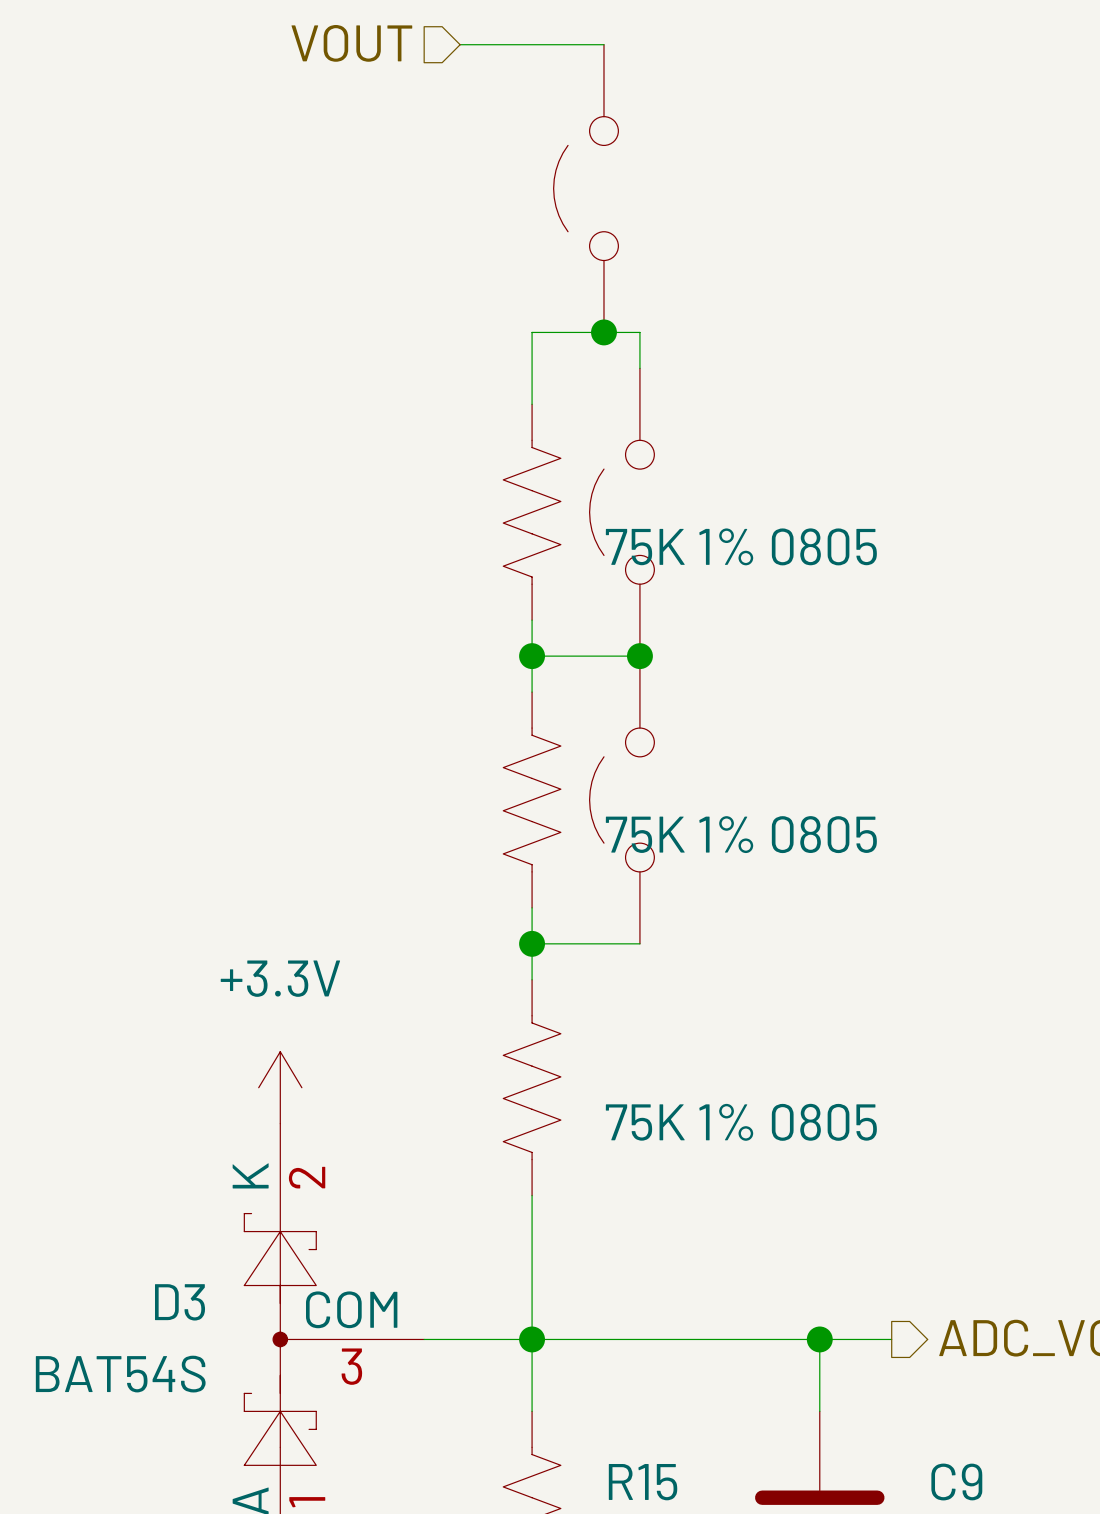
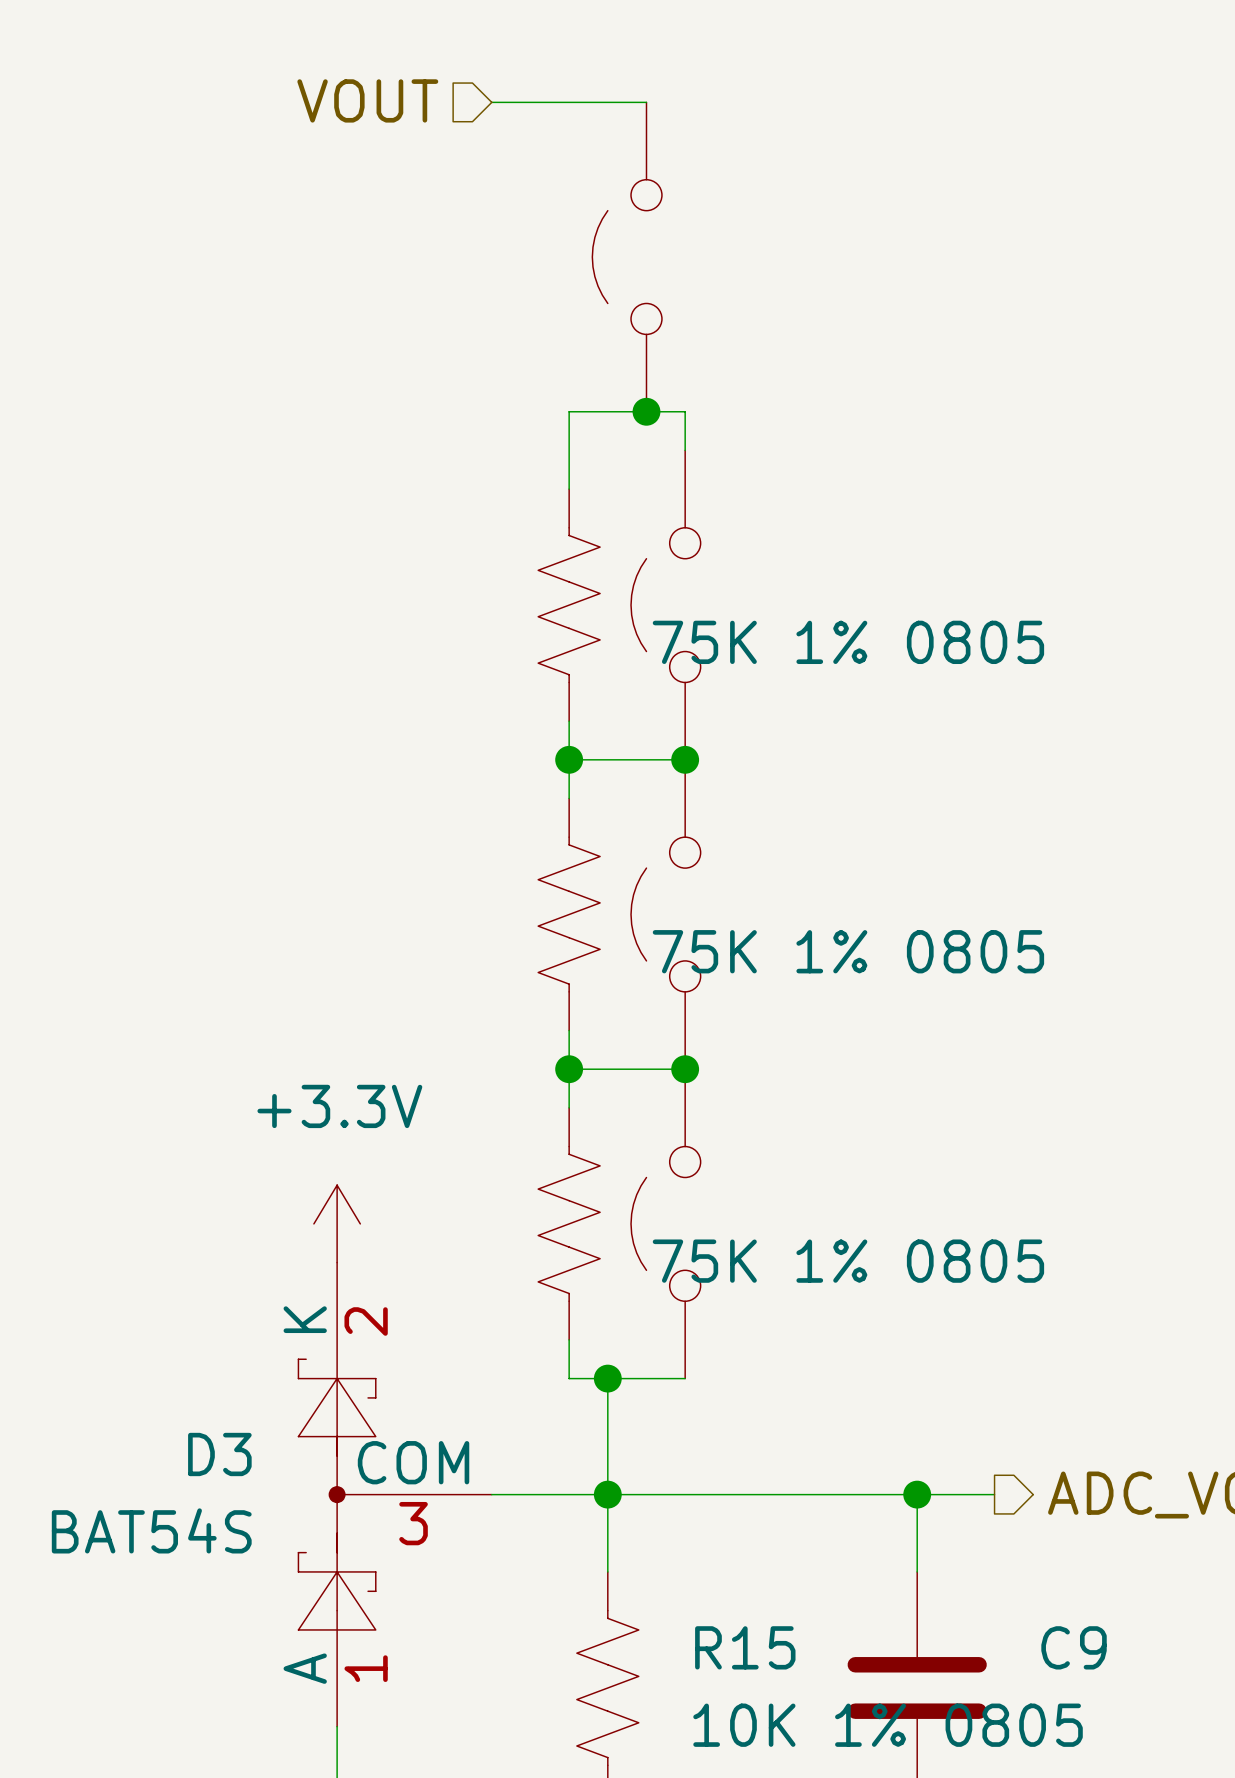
hierarchical label position: VOUT (351, 43) -> VOUT (367, 100)
wire: (568, 44) (603, 44) -> (491, 102) (530, 102)
part position: (586, 188) -> (627, 257)
wire: (532, 332) (532, 404) -> (607, 411) (569, 411) (569, 489)
wire: (603, 332) (639, 332) (639, 368) -> (685, 411) (685, 450)
junction position: (603, 332) -> (646, 411)
part position: (532, 512) -> (569, 605)
part position: (621, 512) -> (665, 605)
wire: (532, 620) (532, 692) -> (569, 721) (569, 798)
junction: none -> (569, 759)
junction: (532, 656) -> none
wire: (603, 656) (639, 656) -> (569, 759) (607, 759)
junction: none -> (685, 759)
junction: (639, 656) -> none
part position: (532, 799) -> (569, 914)
part position: (621, 799) -> (665, 914)
wire: (532, 907) (532, 979) -> (569, 1030) (569, 1107)
junction: none -> (569, 1069)
junction: (532, 943) -> none
wire: (603, 943) (639, 943) -> (569, 1069) (607, 1069)
junction: none -> (685, 1069)
part position: (532, 1087) -> (569, 1223)
part: none -> (665, 1223)
wire: none -> (569, 1339) (569, 1378) (685, 1378)
wire: (532, 1195) (532, 1231) -> none
junction: none -> (607, 1378)

